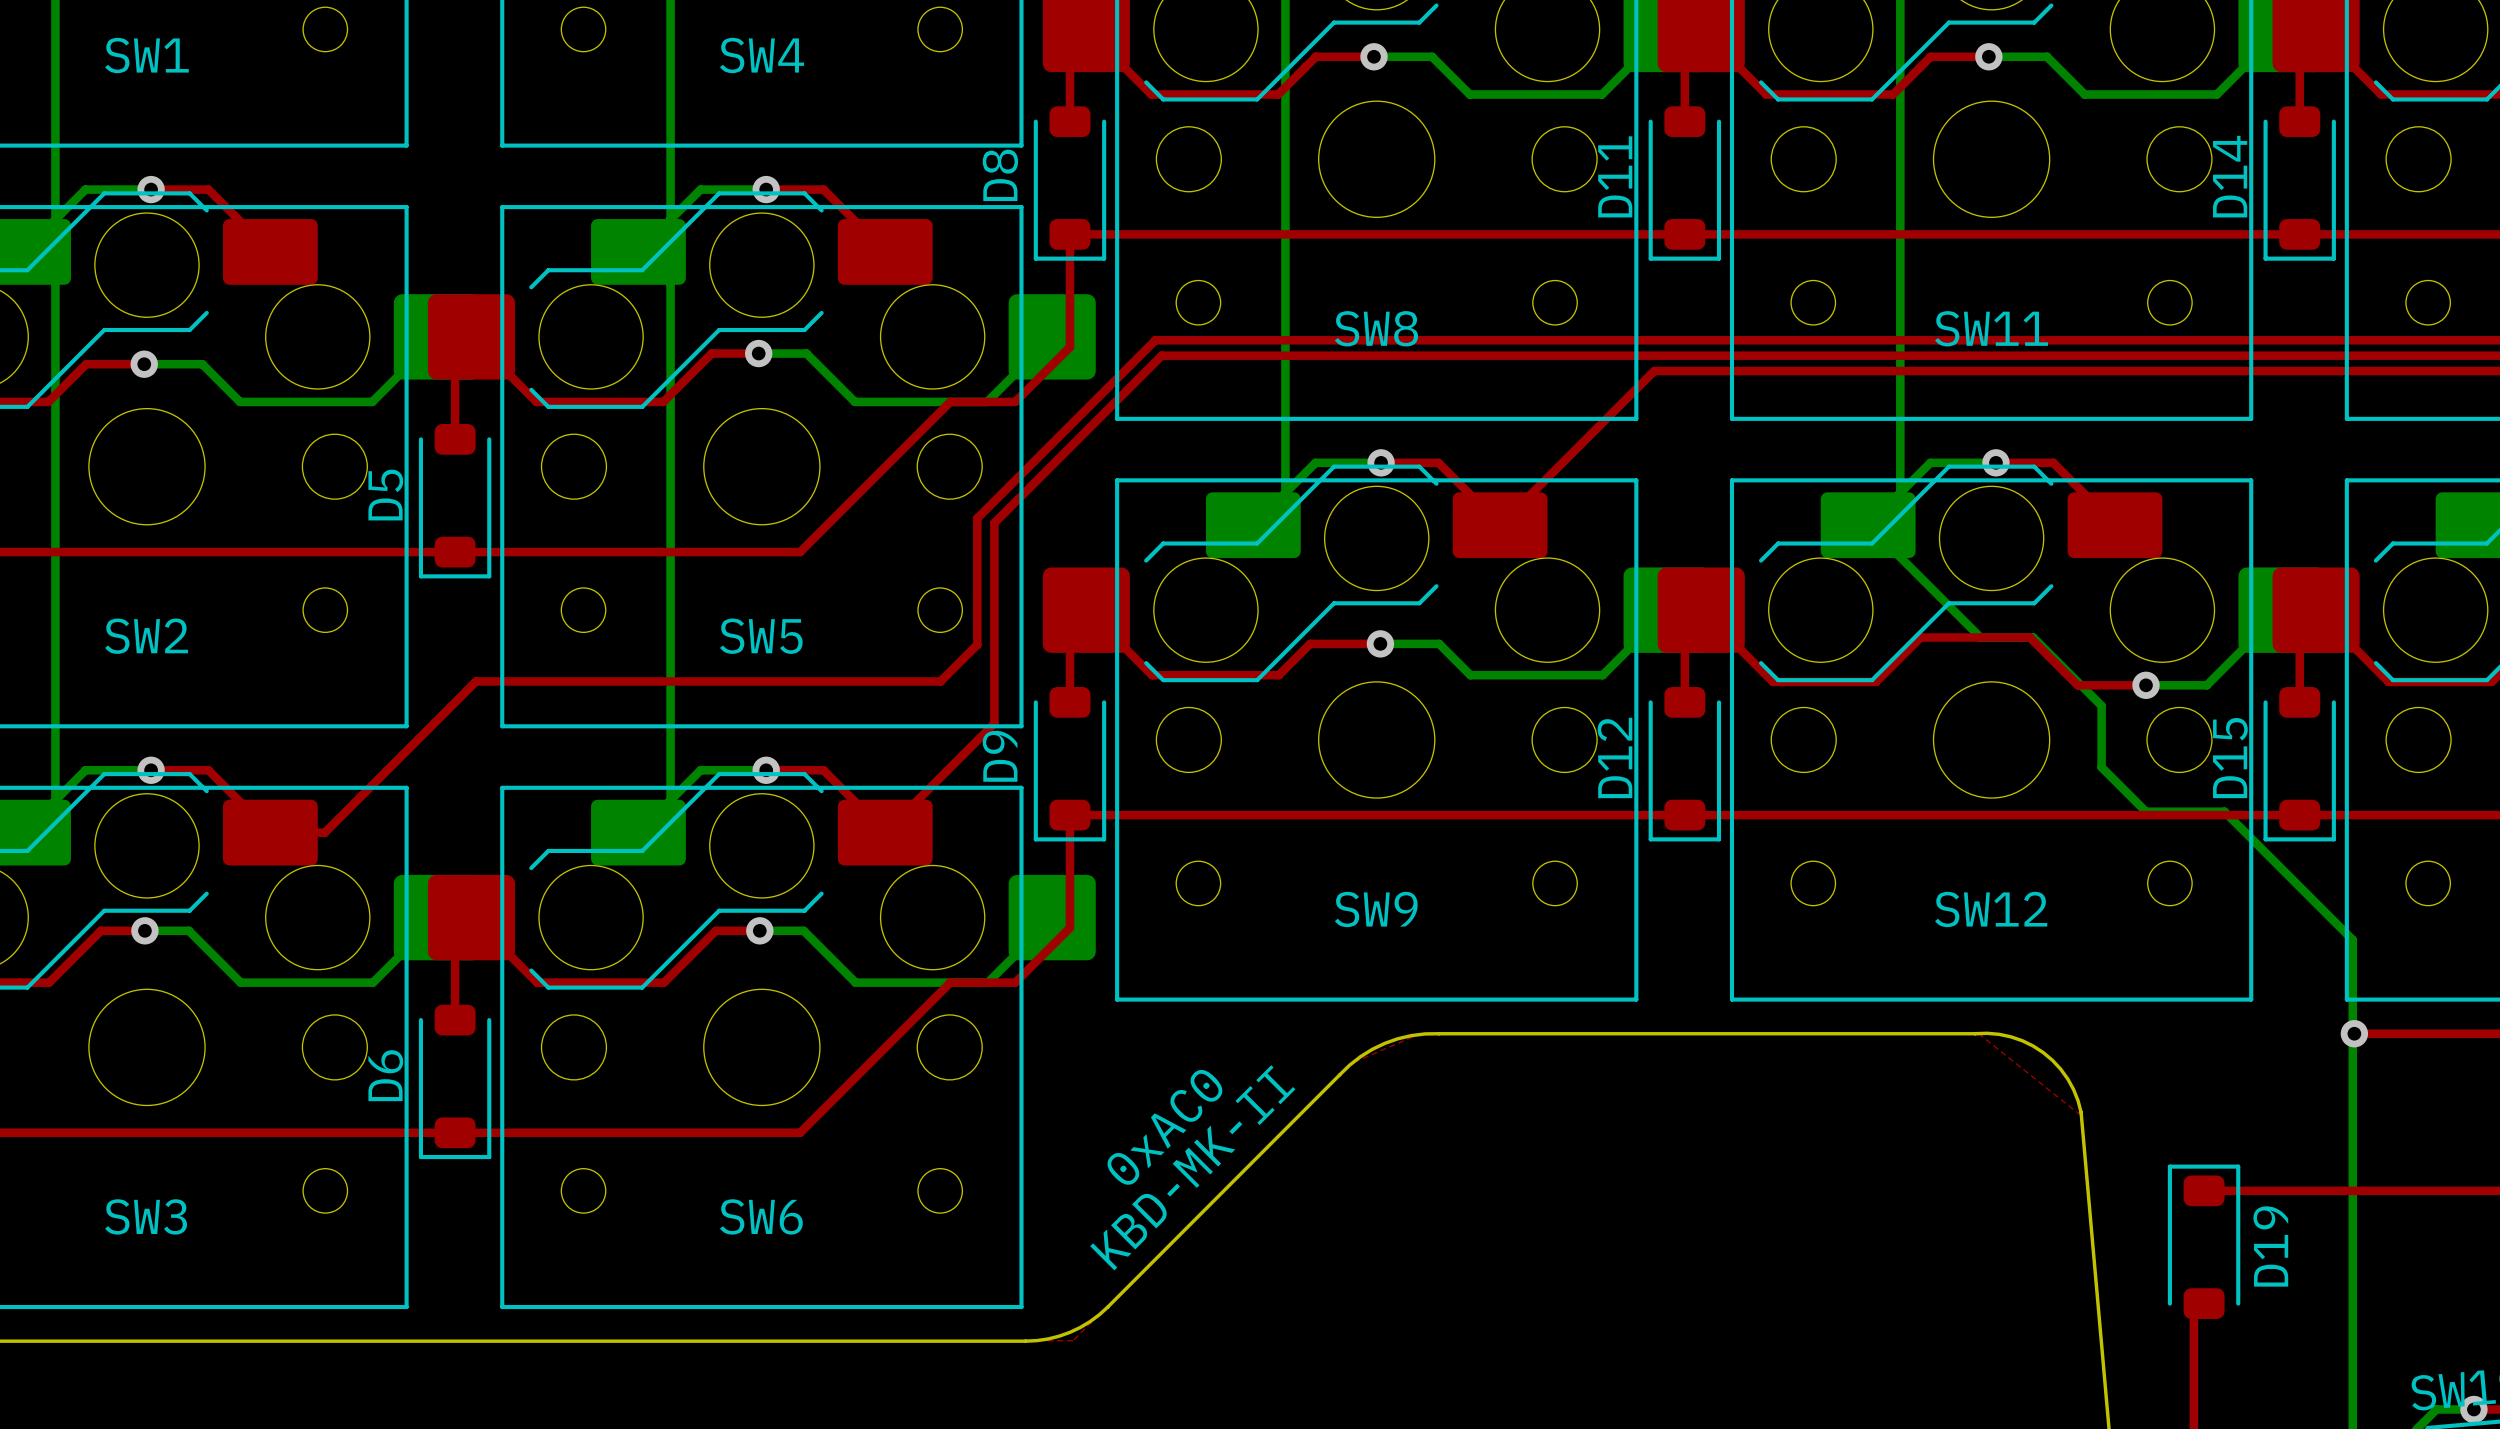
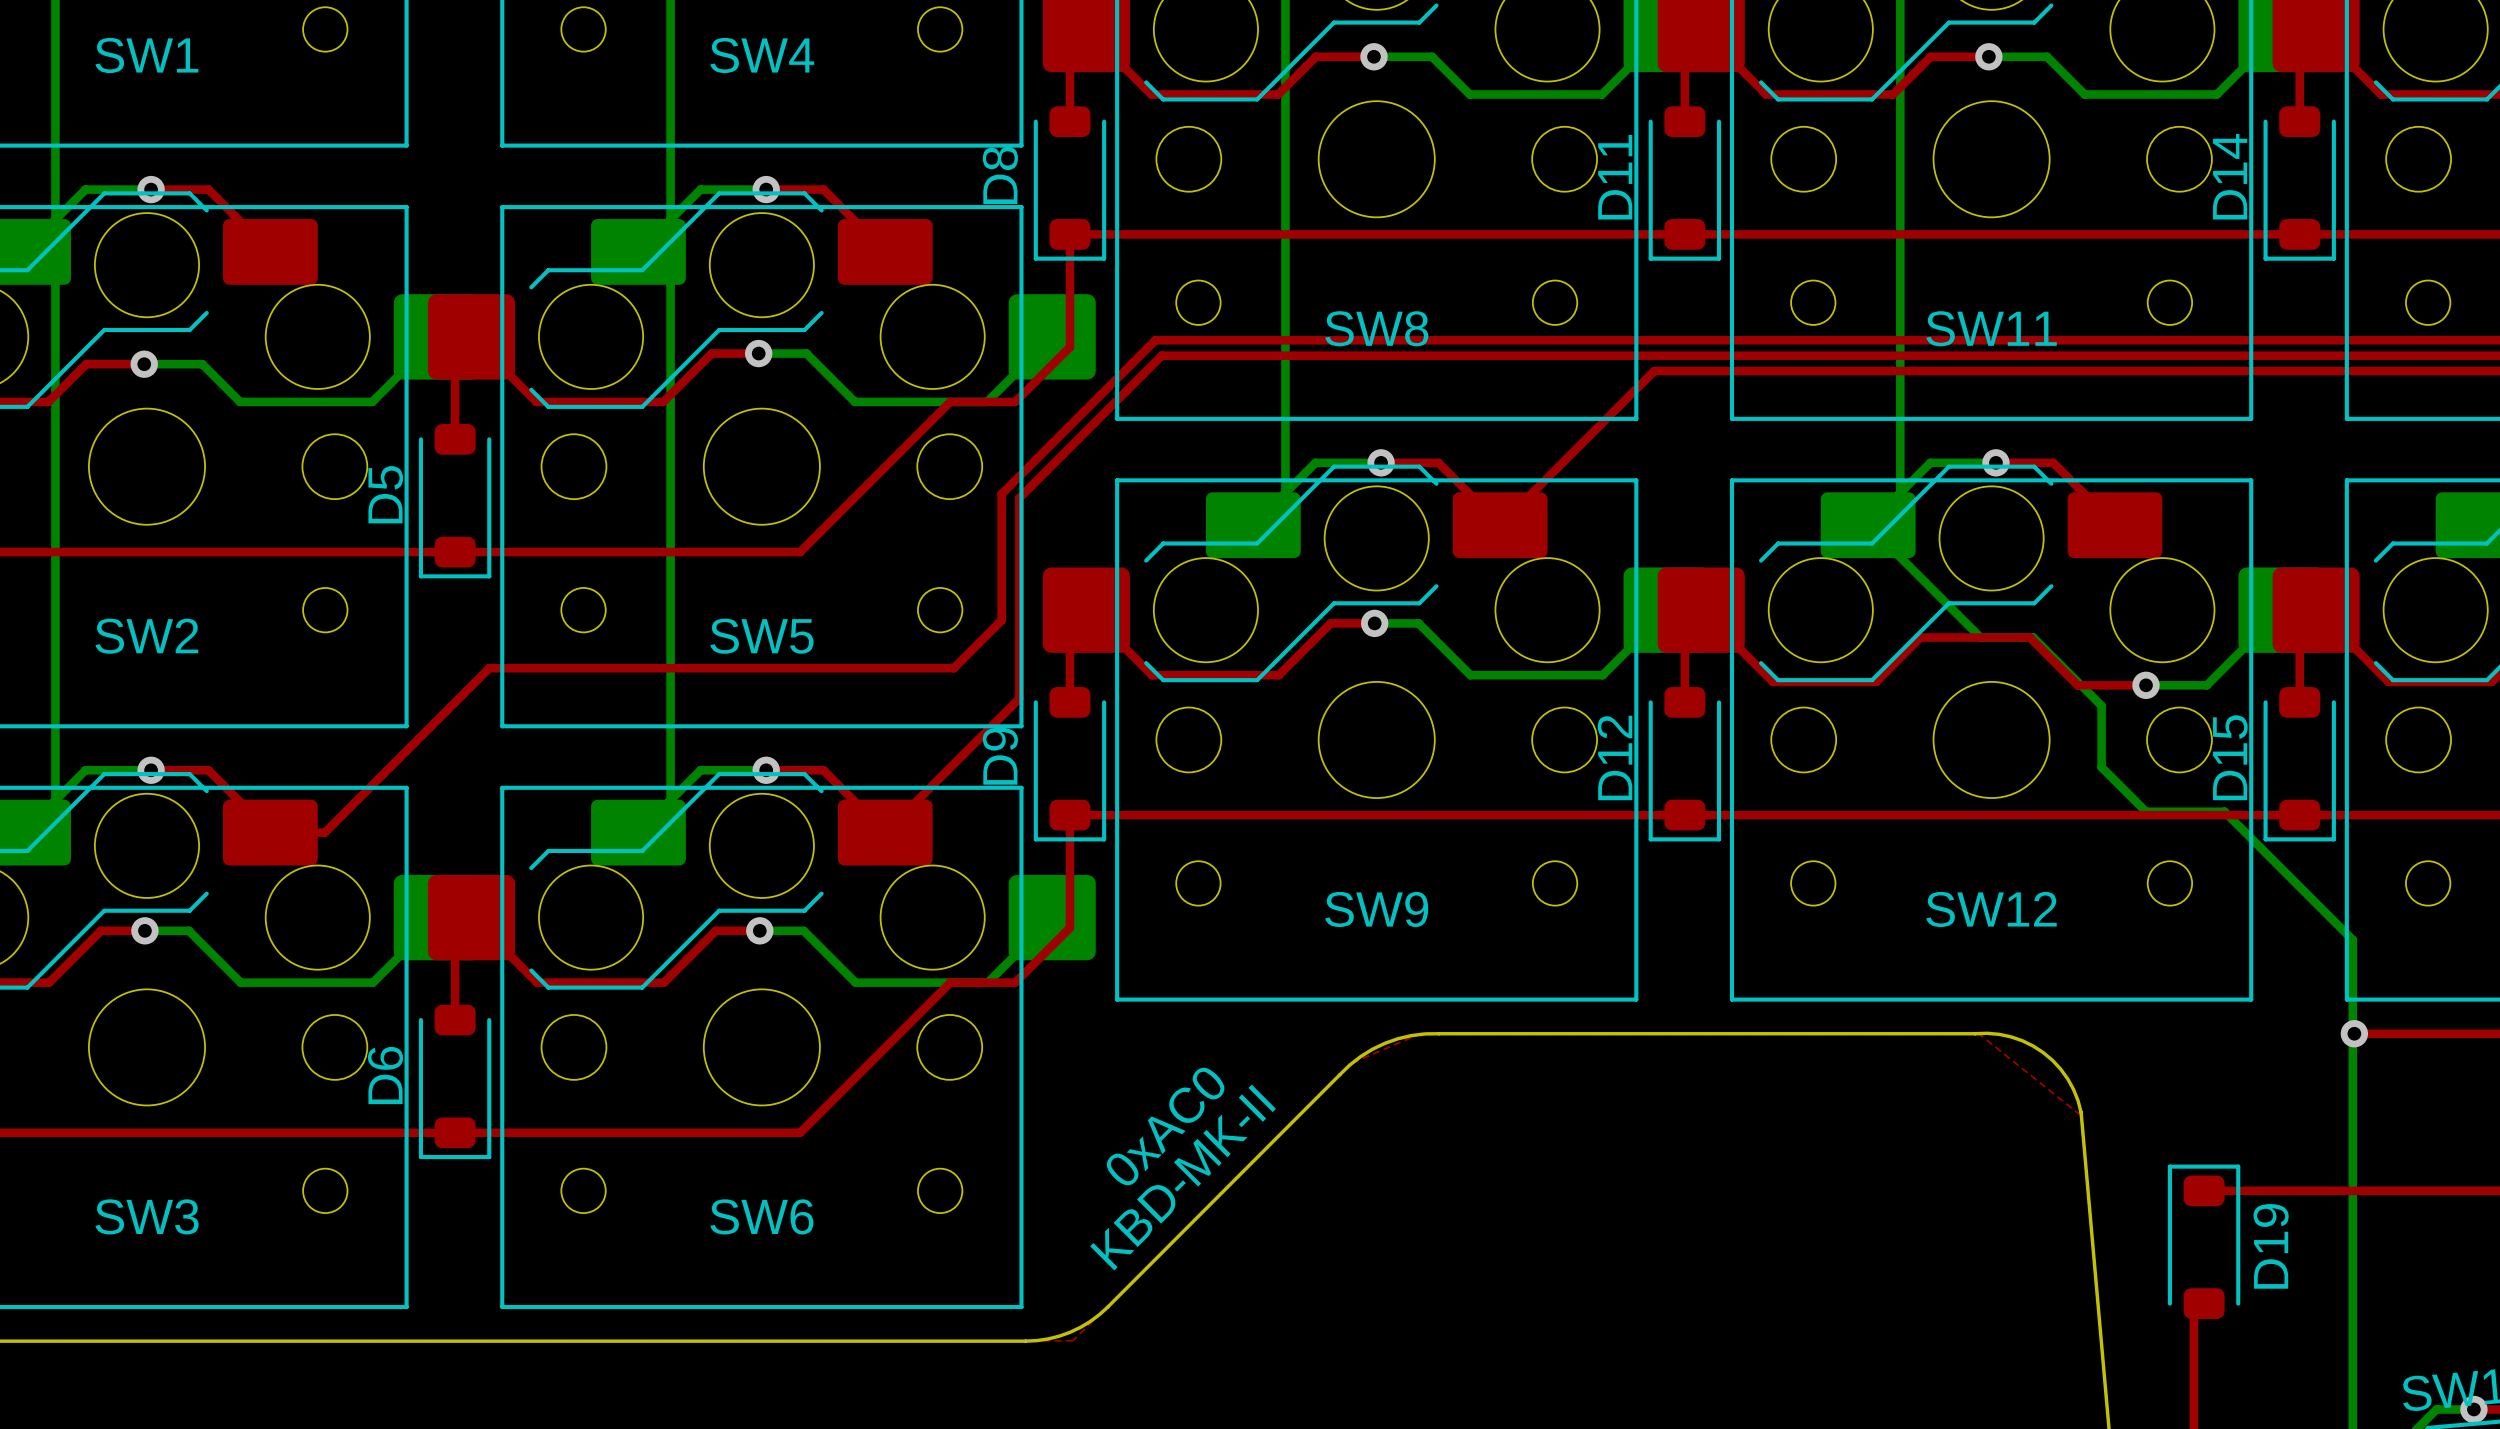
top track: (1001, 494) (977, 518) (977, 644) -> (1001, 494) (1001, 620) (977, 644)
top track: (1019, 498) (994, 523) (994, 723) -> (1019, 498) (1019, 698) (994, 723)
top track: (1310, 643) (1380, 643) -> (1310, 643) (1330, 623) (1374, 623)
bottom track: (1380, 643) (1439, 643) -> (1374, 623) (1418, 623) (1439, 643)
via position: (1380, 643) -> (1374, 623)
top track: (953, 668) (940, 681) (476, 681) -> (953, 668) (489, 668) (476, 681)

